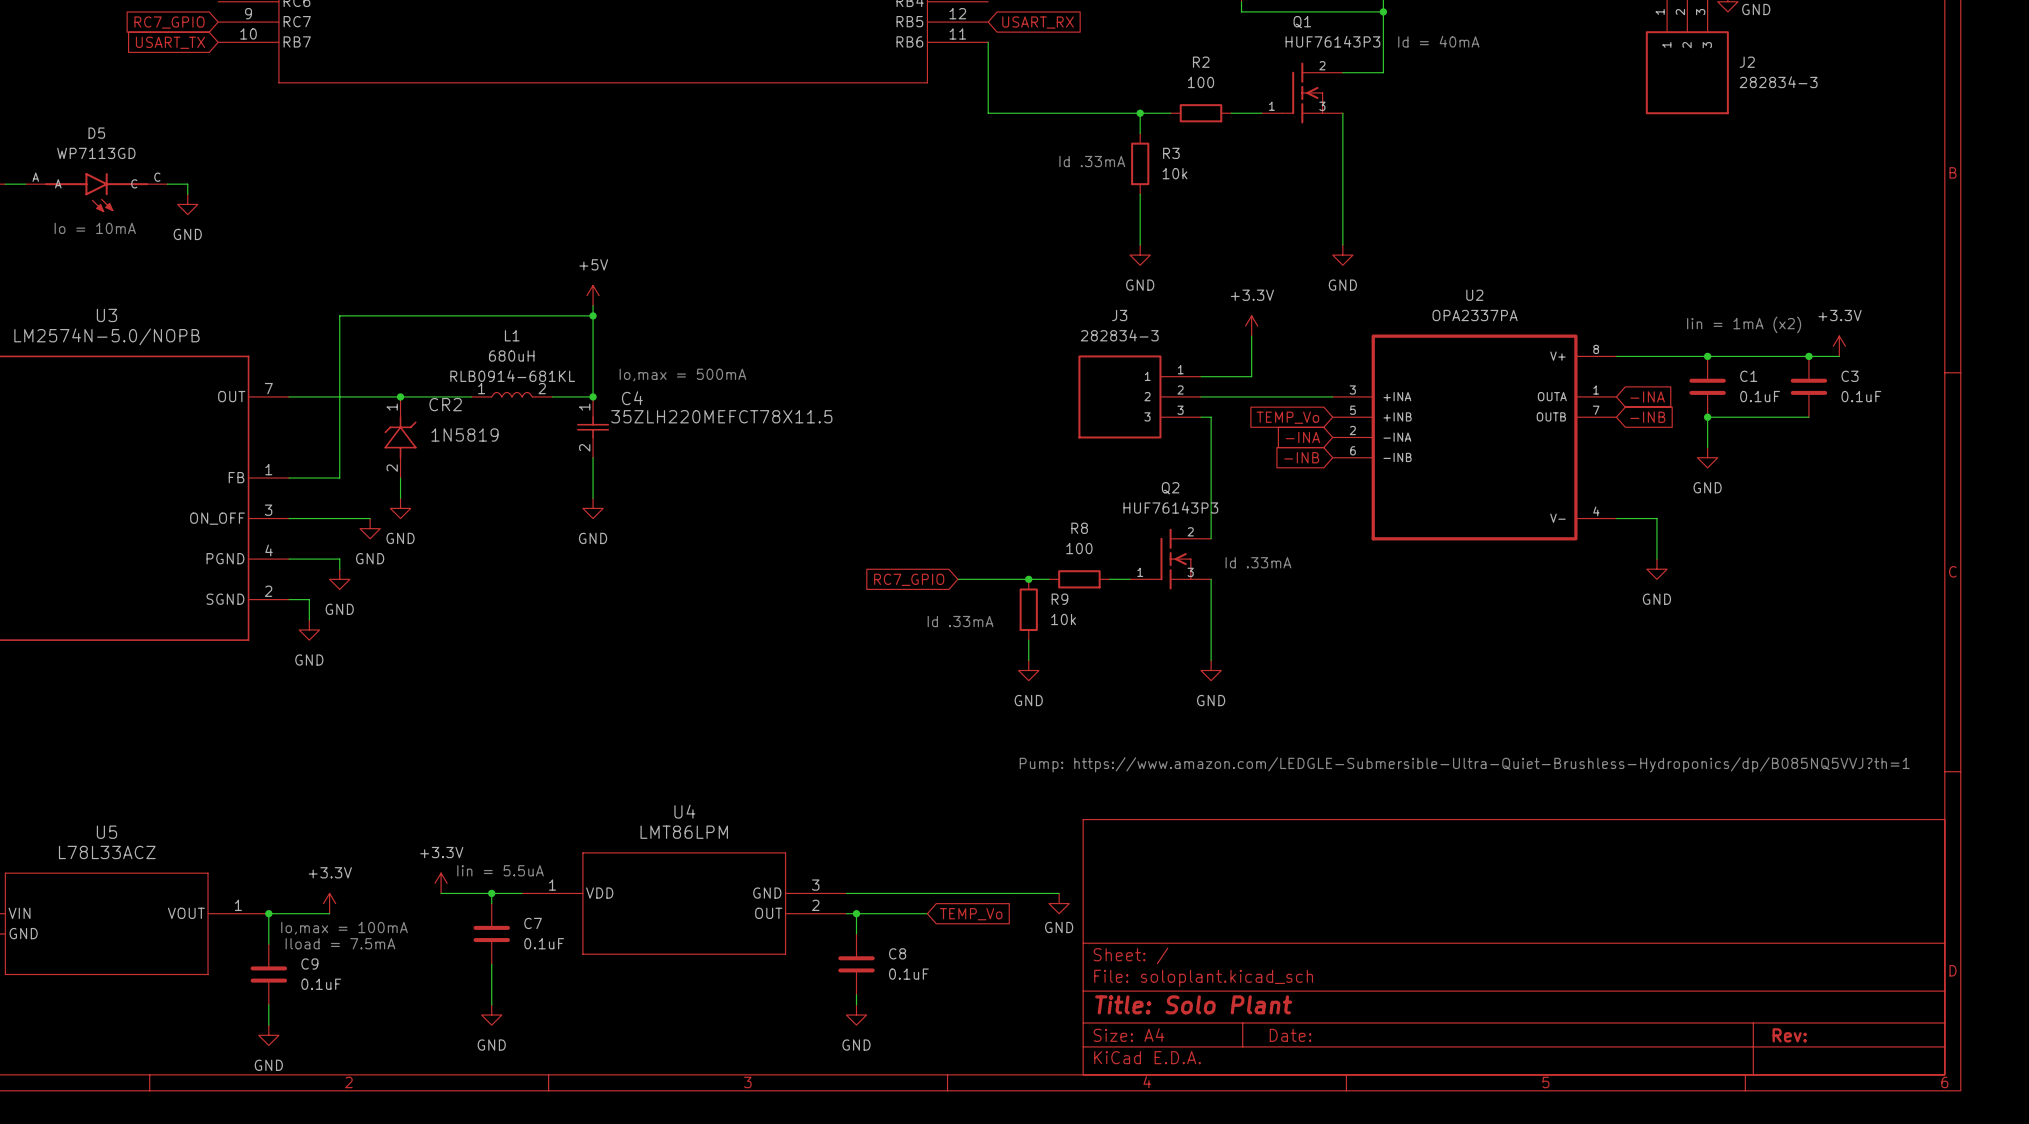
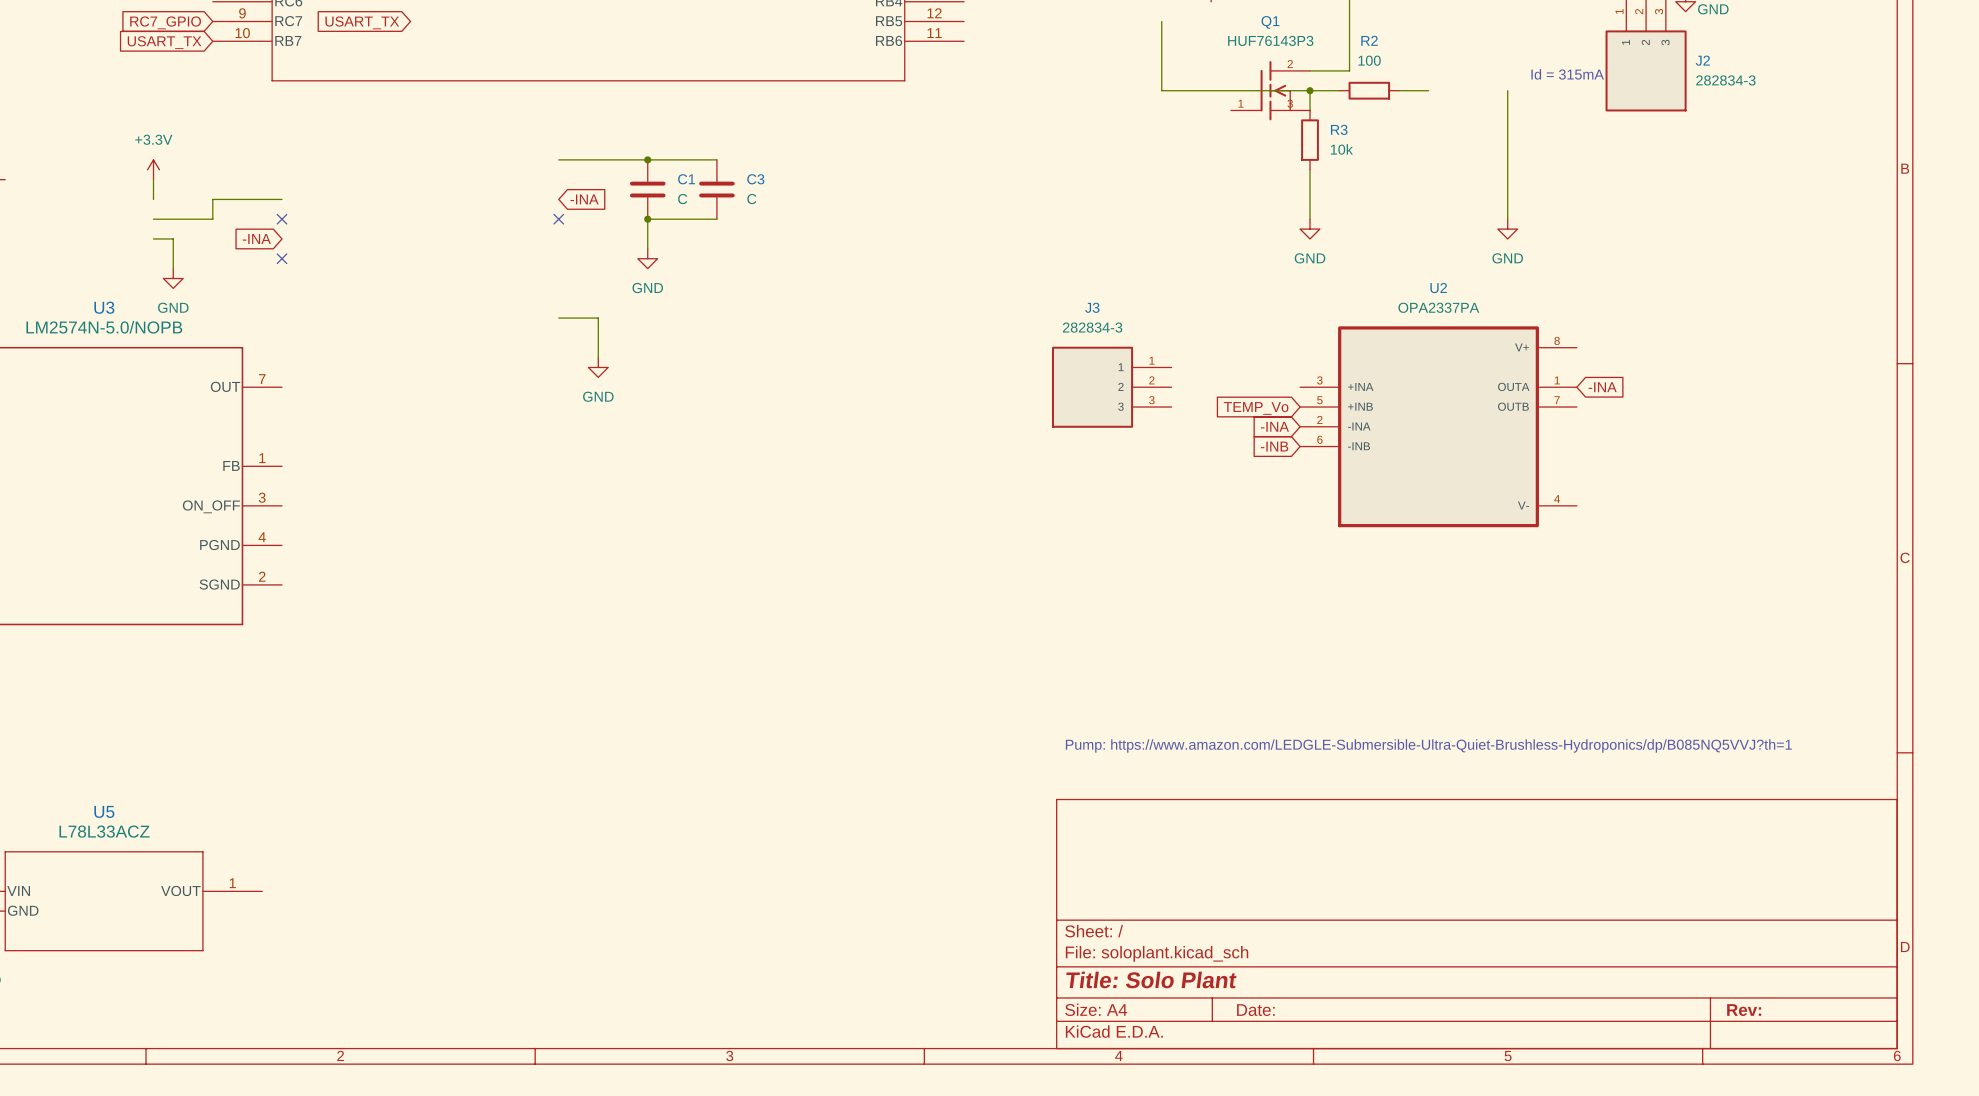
wire: (1241, 1) (1241, 11) (1383, 11) -> none
junction: (1383, 11) -> none
global label: none -> USART_TX (362, 22)
global label: USART_RX (1038, 22) -> none
wire: none -> (1161, 21) (1161, 90) (1339, 90)
Q1 value position: HUF76143P3 (1332, 41) -> HUF76143P3 (1270, 40)
text: Id = 40mA (1438, 41) -> none
wire: (988, 42) (988, 113) (1170, 113) -> none
text: none -> Id = 315mA (1567, 74)
junction: none -> (1310, 90)
wire: none -> (1398, 90) (1428, 90)
wire: none -> (1507, 90) (1507, 219)
wire: (1140, 113) (1140, 133) -> none
junction: (1140, 113) -> none
R2 position: (1200, 113) -> (1369, 90)
wire: (1231, 113) (1261, 113) -> none
wire: (1342, 113) (1342, 174) -> (1310, 110) (1310, 90)
text: Id .33mA (1092, 161) -> none
wire: none -> (558, 159) (716, 159)
junction: none -> (647, 159)
R3 position: (1140, 163) -> (1310, 140)
power symbol: none -> +3.3V (153, 169)
wire: (5, 184) (25, 184) -> none
wire: none -> (153, 179) (153, 199)
wire: (167, 184) (187, 184) (187, 194) -> none
D5: WP7113GD (96, 192) -> none
wire: (1140, 194) (1140, 244) -> none
power symbol position: GND (187, 204) -> GND (173, 278)
wire: none -> (282, 199) (212, 199) (212, 219) (153, 219)
global label: none -> -INA (584, 199)
no-connect mark: none -> (282, 219)
no-connect mark: none -> (558, 219)
junction: none -> (647, 219)
wire: none -> (716, 219) (647, 219) (647, 248)
text: Io = 10mA (95, 228) -> none
power symbol: none -> GND (1507, 229)
wire: none -> (153, 238) (173, 238) (173, 268)
global label: none -> -INA (256, 238)
power symbol: GND (1140, 255) -> none
power symbol position: GND (1342, 255) -> GND (1310, 229)
no-connect mark: none -> (282, 258)
power symbol: none -> GND (647, 258)
power symbol: +5V (593, 295) -> none
wire: (593, 305) (593, 396) (552, 396) -> none
wire: (593, 315) (339, 315) (339, 478) (289, 478) -> none
junction: (593, 315) -> none
text: Iin = 1mA (x2) (1744, 324) -> none
wire: none -> (558, 318) (598, 318) (598, 357)
power symbol: +3.3V (1251, 326) -> none
wire: (1251, 336) (1251, 376) (1200, 376) -> none
power symbol: +3.3V (1839, 346) -> none
wire: (1616, 356) (1839, 356) -> none
junction: (1707, 356) -> none
junction: (1808, 356) -> none
text: Io,max = 500mA (682, 375) -> none
power symbol: none -> GND (598, 367)
C1 position: (1707, 386) -> (647, 189)
C3 position: (1808, 386) -> (716, 189)
L1: 680uH (511, 394) -> none
wire: (289, 396) (471, 396) -> none
junction: (400, 396) -> none
junction: (593, 396) -> none
wire: (1200, 396) (1332, 396) -> none
C1 value: 0.1uF (1760, 396) -> C (682, 199)
C3 value: 0.1uF (1861, 396) -> C (751, 199)
wire: (1200, 417) (1211, 417) (1211, 538) -> none
global label: -INB (1647, 417) -> none
junction: (1707, 417) -> none
wire: (1808, 417) (1707, 417) (1707, 447) -> none
C4: 35ZLH220MEFCT78X11.5 (593, 427) -> none
CR2: 1N5819 (400, 437) -> none
wire: (593, 457) (593, 498) -> none
power symbol: GND (1707, 457) -> none
wire: (400, 478) (400, 498) -> none
power symbol: GND (400, 508) -> none
power symbol: GND (593, 508) -> none
wire: (289, 518) (370, 518) -> none
wire: (1616, 518) (1656, 518) (1656, 559) -> none
power symbol: GND (370, 528) -> none
wire: (289, 559) (339, 559) (339, 569) -> none
Q2: HUF76143P3 (1170, 559) -> none
text: Id .33mA (1258, 562) -> none
power symbol: GND (1656, 569) -> none
power symbol: GND (339, 579) -> none
global label: RC7_GPIO (909, 579) -> none
wire: (957, 579) (1049, 579) -> none
junction: (1028, 579) -> none
R8: 100 (1079, 579) -> none
wire: (1109, 579) (1130, 579) -> none
wire: (1211, 579) (1211, 660) -> none
wire: (289, 599) (309, 599) (309, 619) -> none
R9: 10k (1028, 609) -> none
text: Id .33mA (960, 621) -> none
power symbol: GND (309, 629) -> none
wire: (1028, 640) (1028, 660) -> none
power symbol: GND (1028, 670) -> none
power symbol: GND (1211, 670) -> none
text: Iin = 5.5uA (500, 870) -> none
power symbol: +3.3V (441, 883) -> none
wire: (441, 893) (522, 893) -> none
wire: (491, 893) (491, 903) -> none
junction: (491, 893) -> none
wire: (846, 893) (1059, 893) -> none
power symbol: +3.3V (329, 903) -> none
U4: LMT86LPM (684, 903) -> none
power symbol: GND (1059, 903) -> none
junction: (268, 913) -> none
wire: (329, 913) (268, 913) (268, 944) -> none
wire: (846, 913) (927, 913) -> none
wire: (856, 913) (856, 933) -> none
junction: (856, 913) -> none
global label: TEMP_Vo (971, 914) -> none
text: Io,max = 100mA (344, 928) -> none
C7: 0.1uF (491, 933) -> none
text: Iload = 7.5mA (340, 943) -> none
wire: (491, 964) (491, 1004) -> none
C8: 0.1uF (856, 964) -> none
C9: 0.1uF (268, 974) -> none
wire: (856, 994) (856, 1004) -> none
wire: (268, 1004) (268, 1025) -> none
power symbol: GND (491, 1015) -> none
power symbol: GND (856, 1015) -> none
power symbol: GND (268, 1035) -> none

